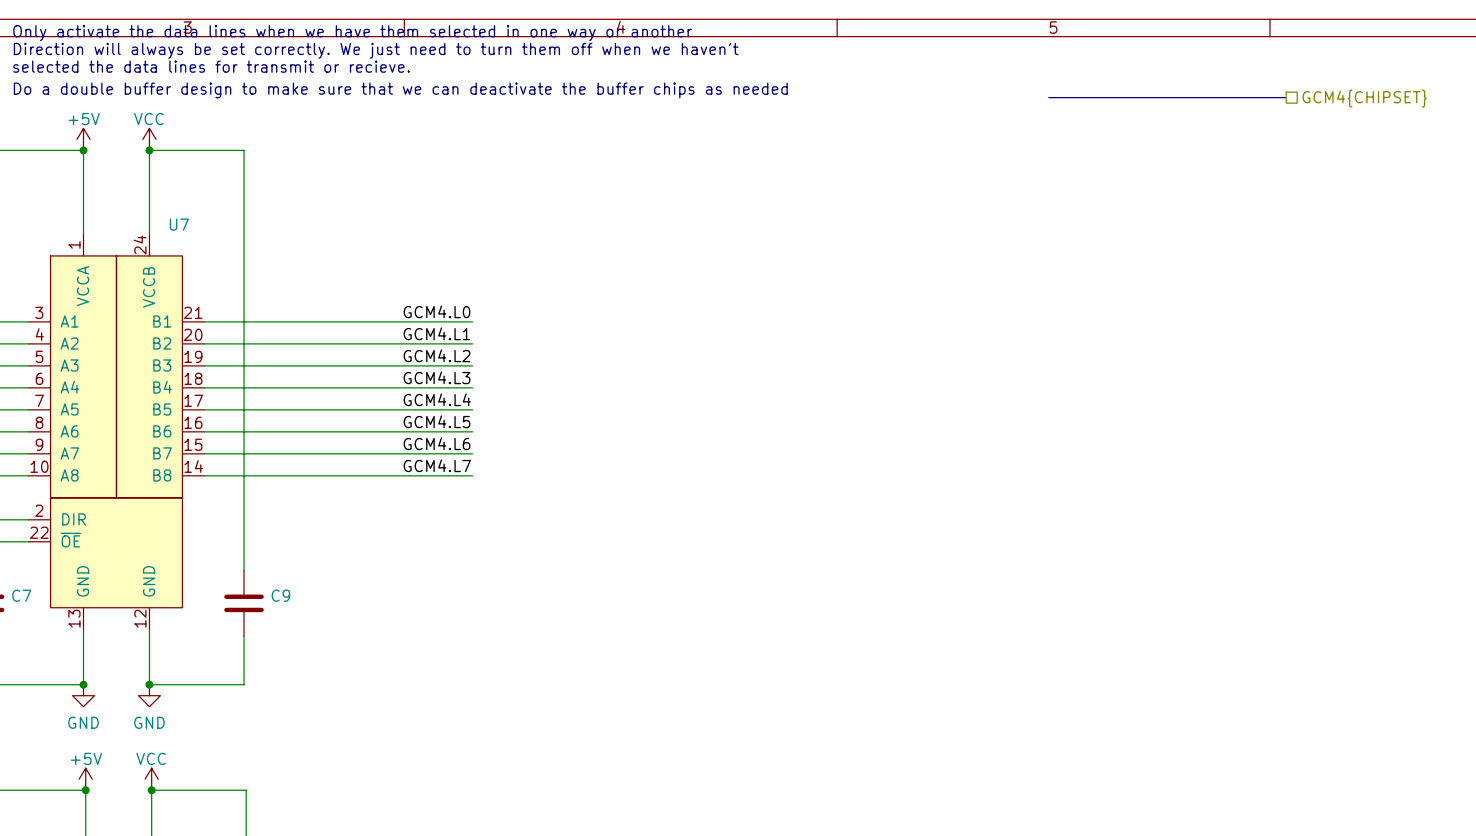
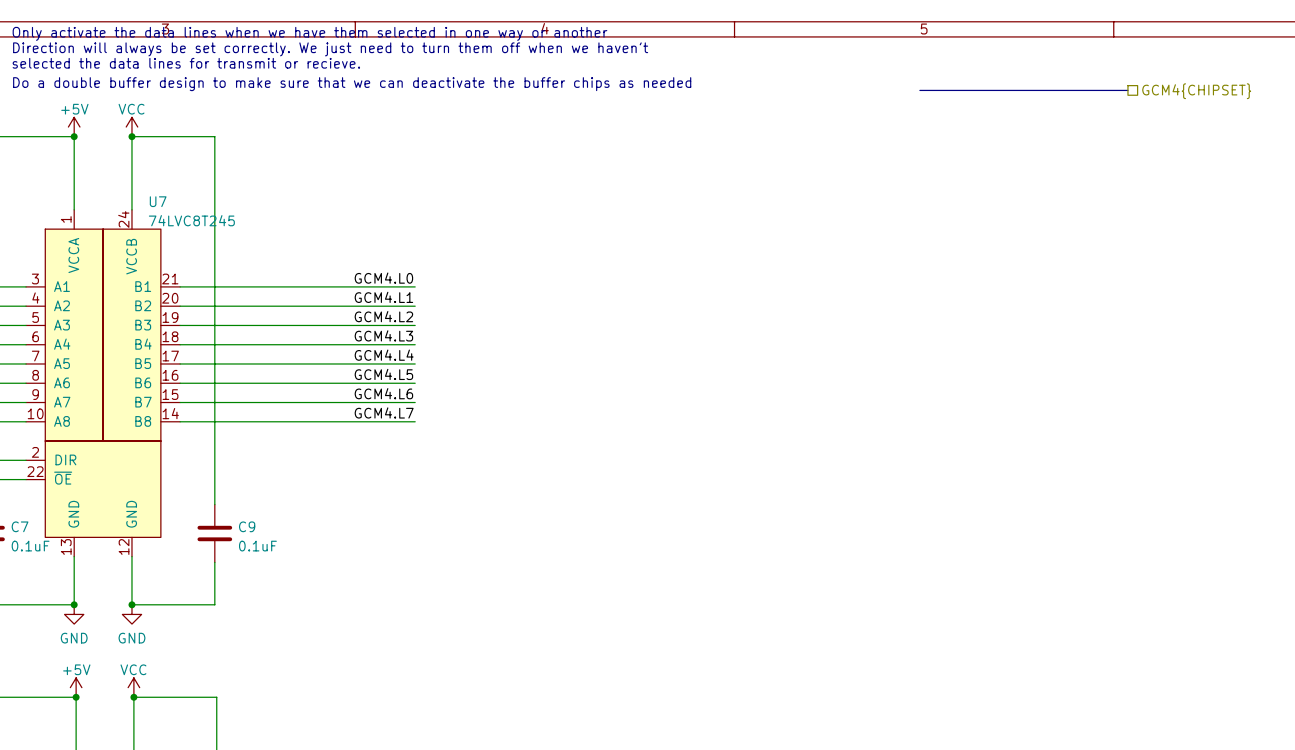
U7 value: none -> 74LVC8T245 (191, 220)
C7 value: none -> 0.1uF (30, 546)
C9 value: none -> 0.1uF (257, 546)

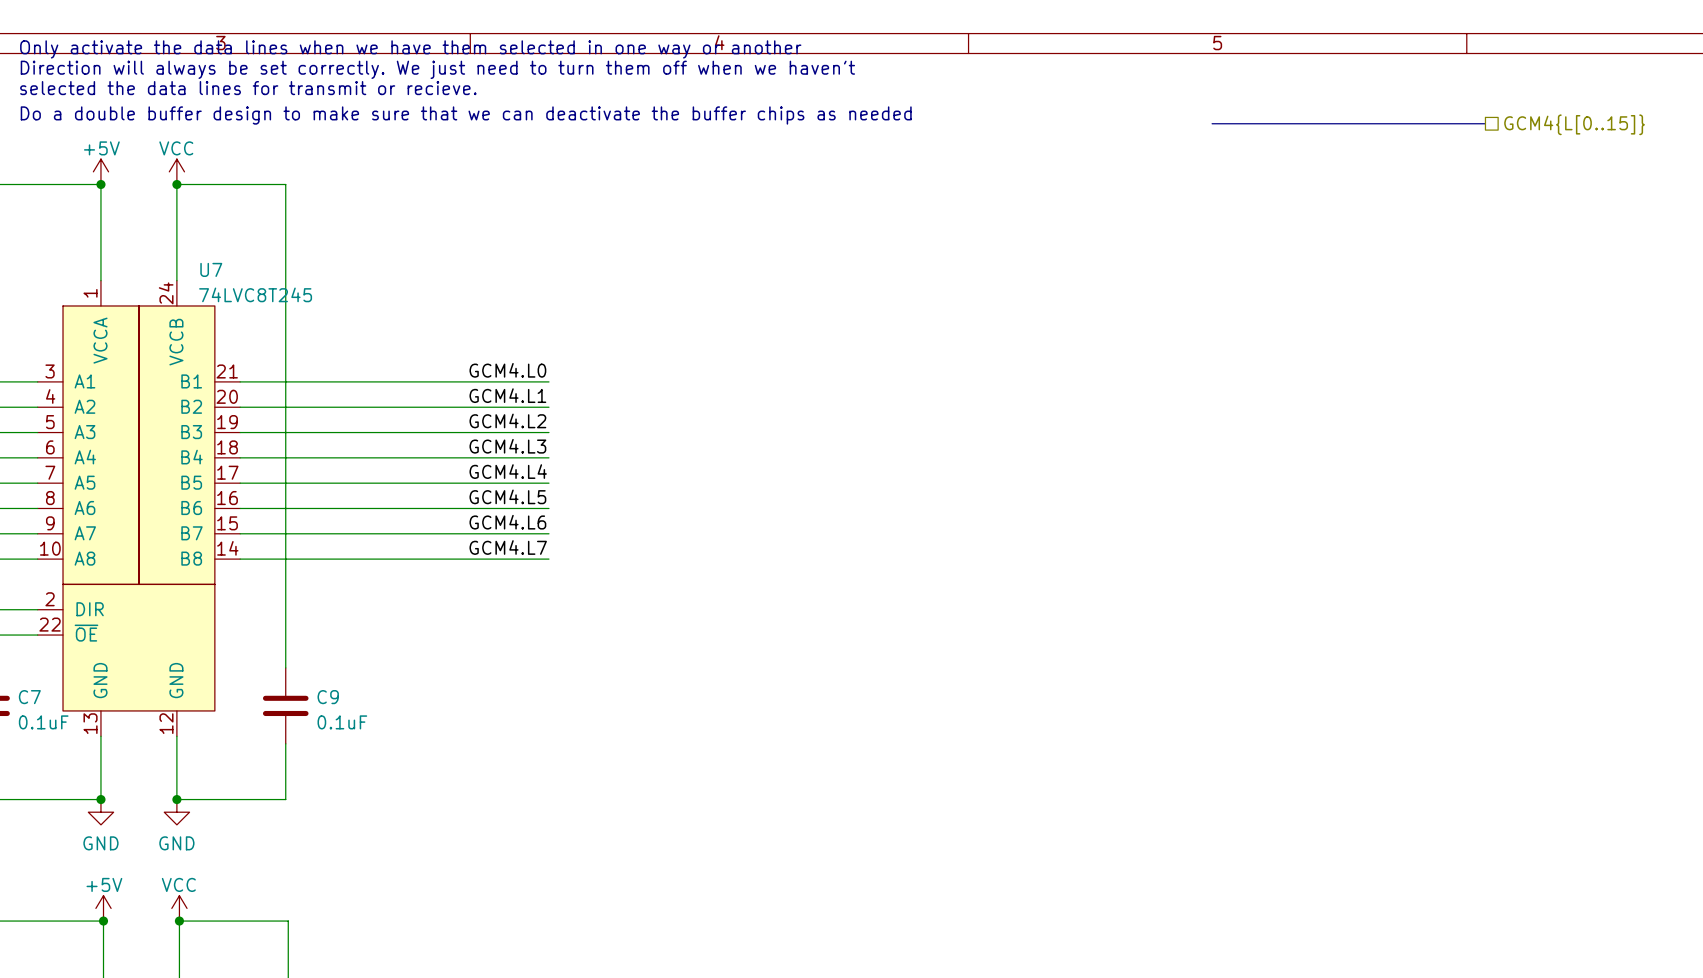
hierarchical label: GCM4{CHIPSET} (1196, 91) -> GCM4{L[0..15]} (1574, 124)

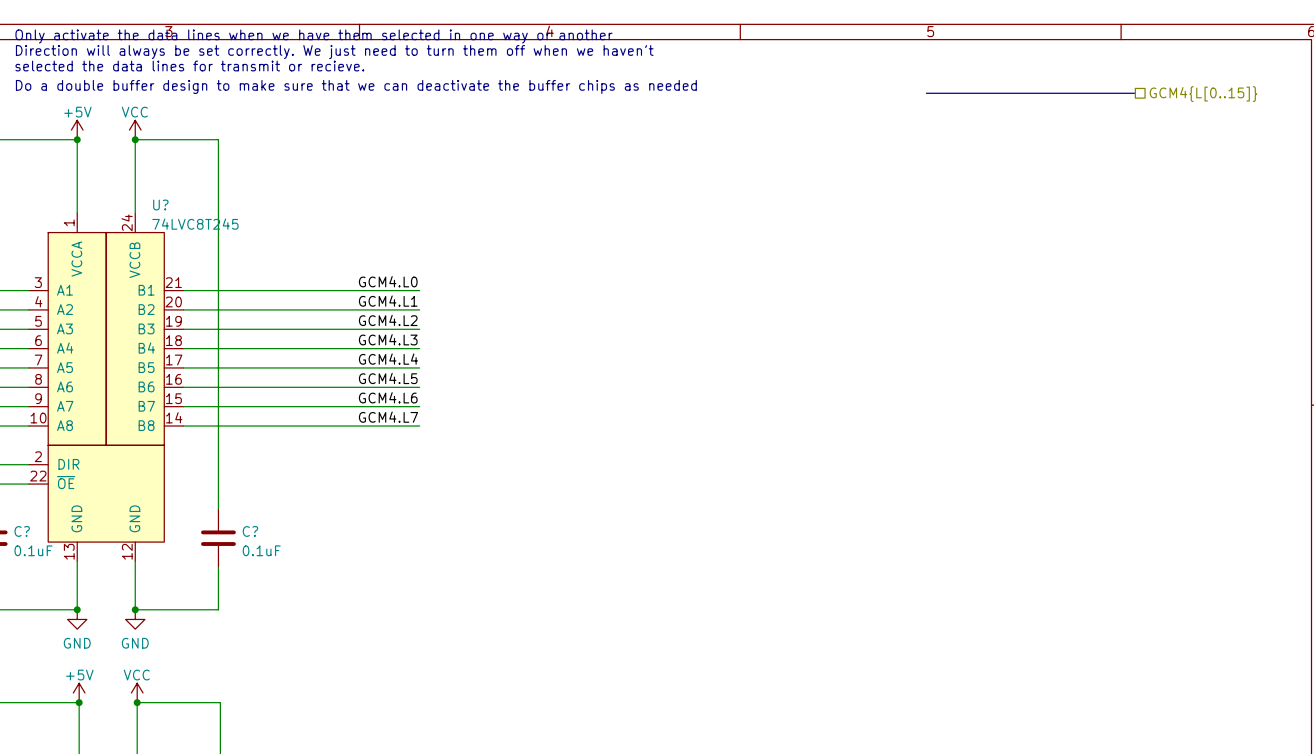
U7 name: U7 (211, 269) -> U? (160, 204)
C7 name: C7 (29, 697) -> C? (22, 531)
C9 name: C9 (328, 697) -> C? (250, 531)

